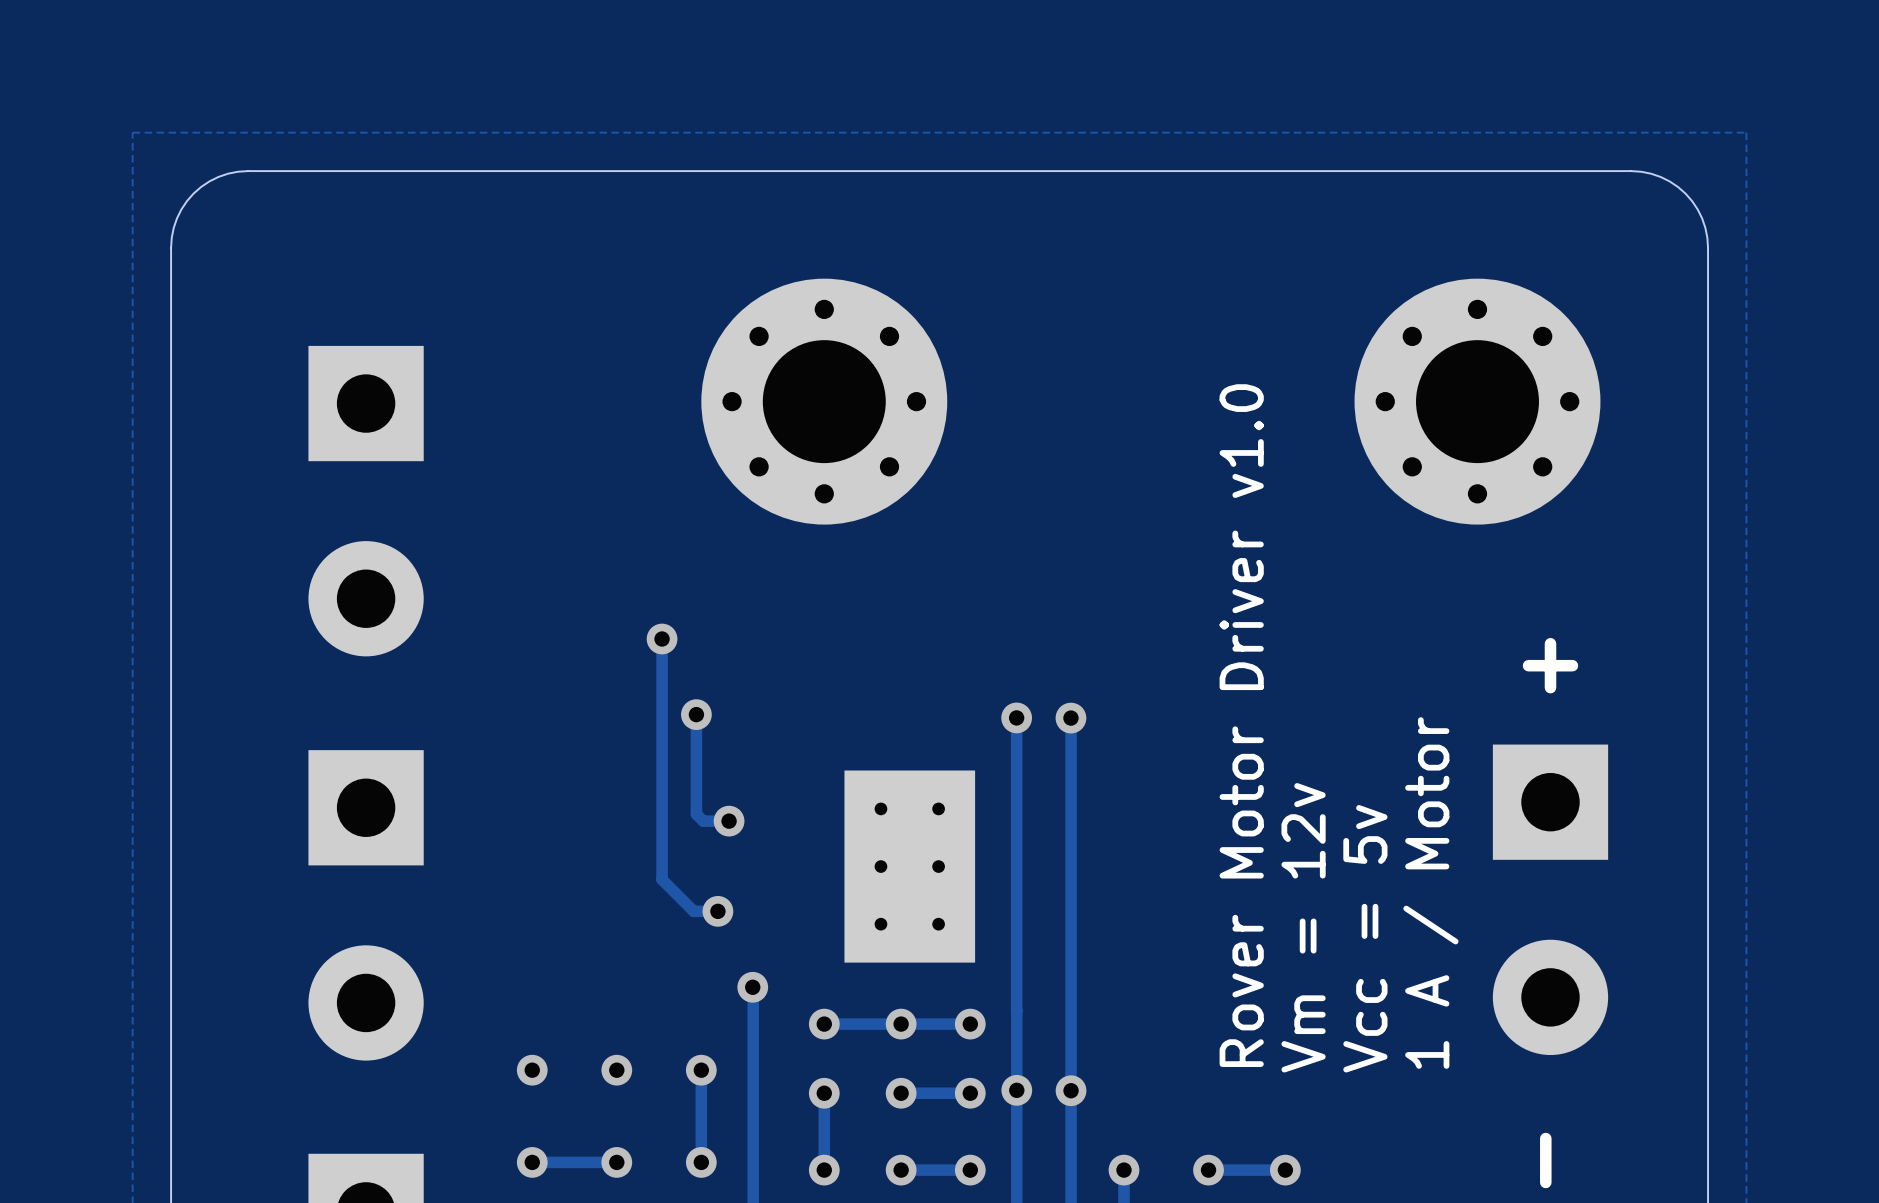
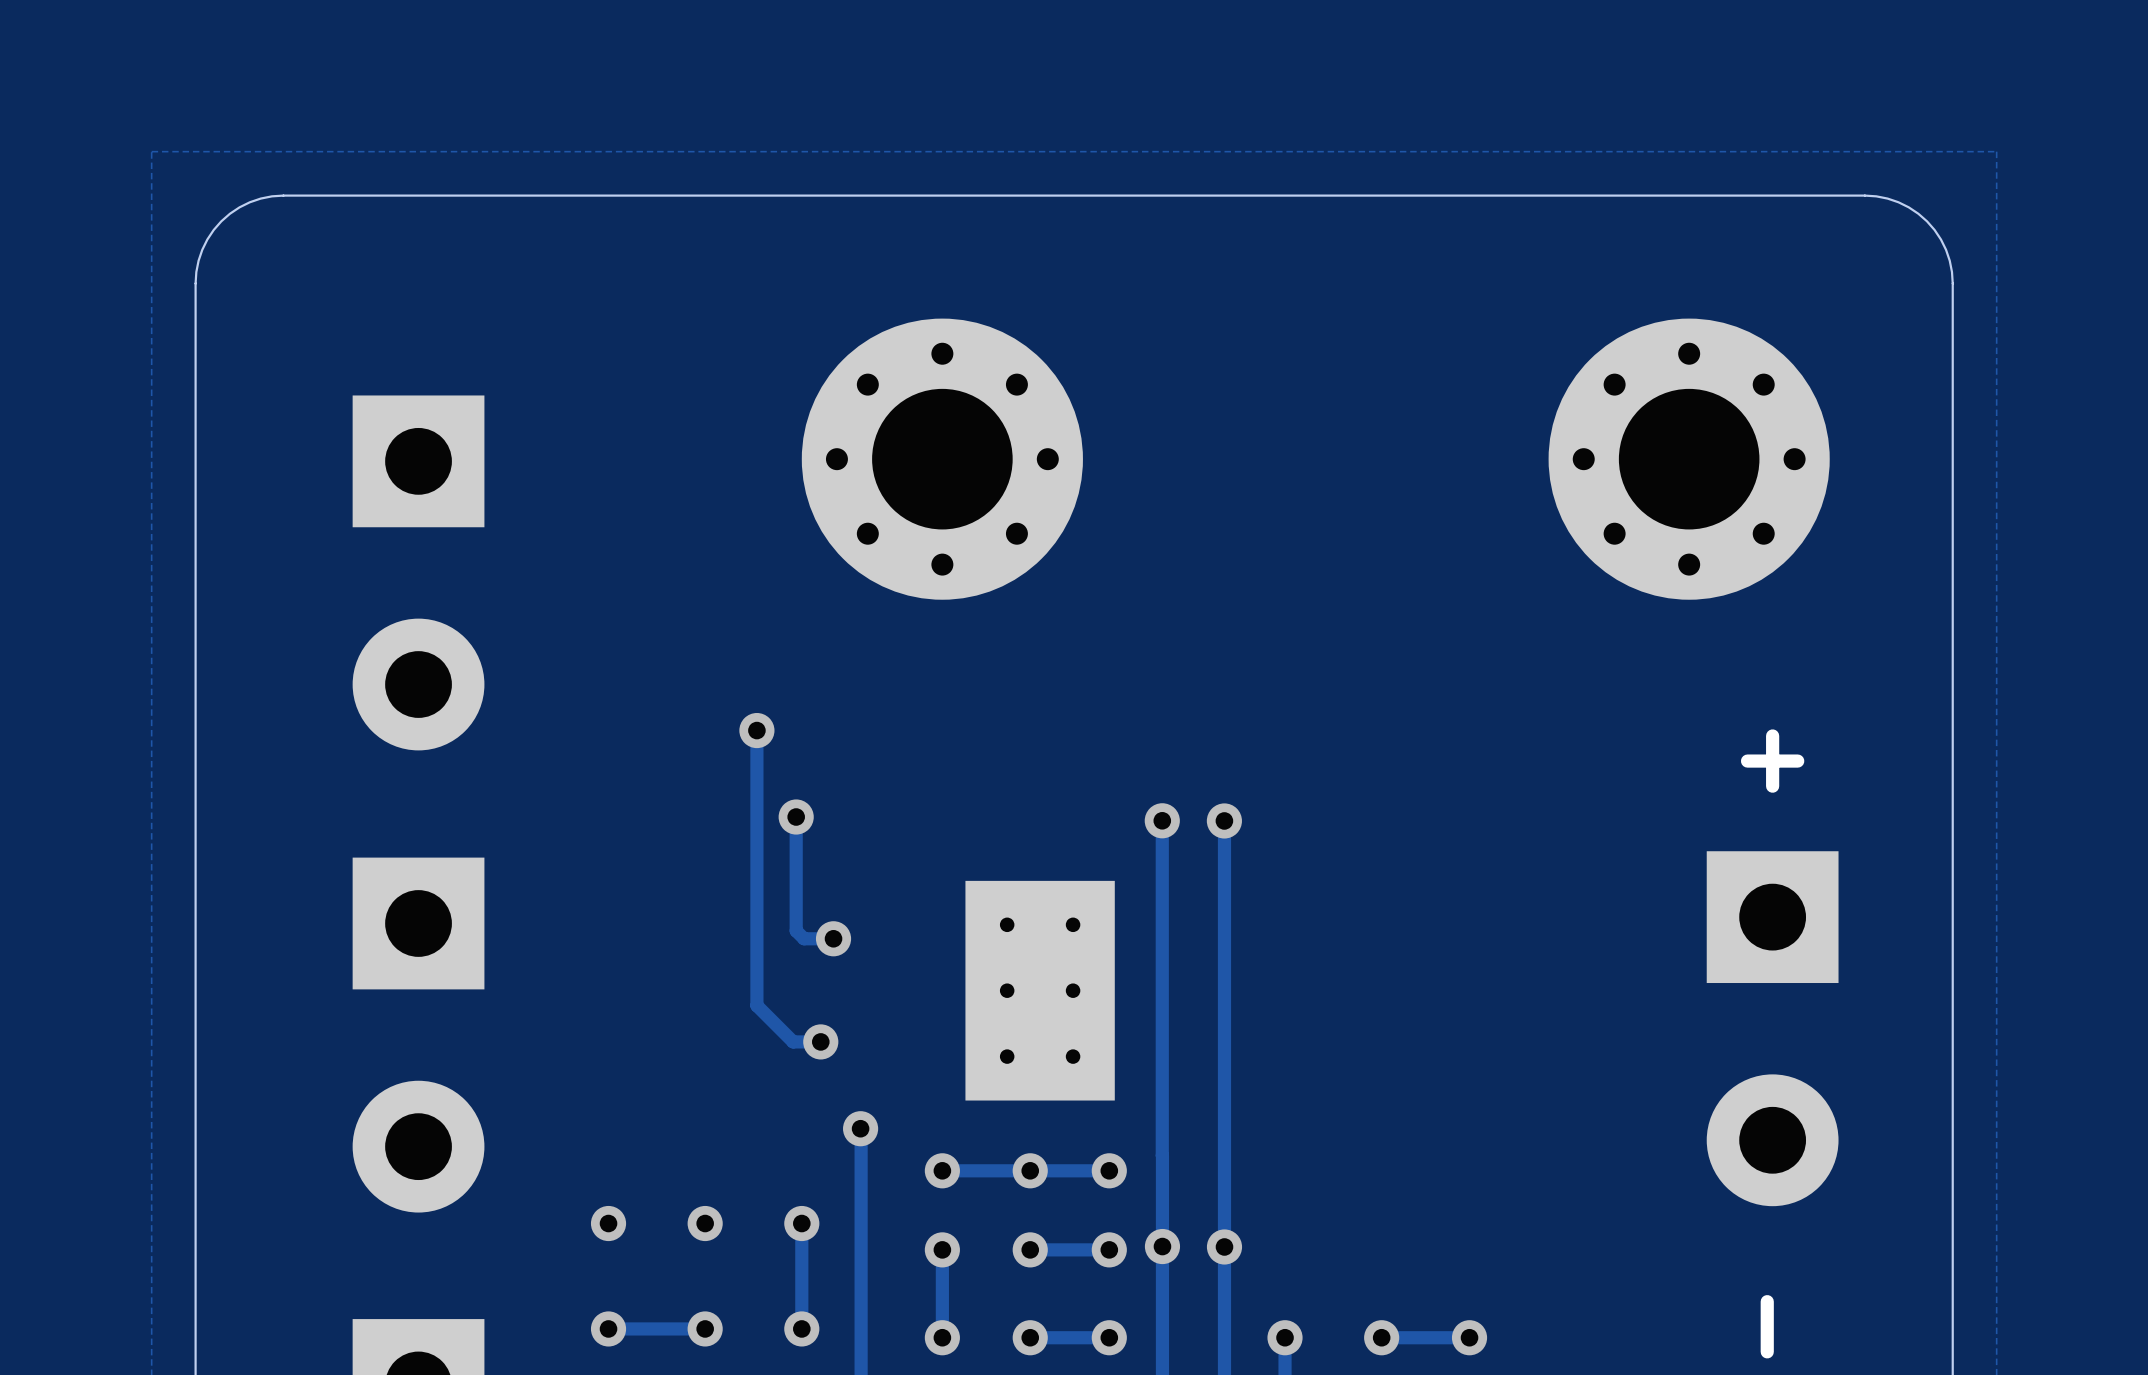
text: Rover Motor Driver v1.0 (1241, 725) -> none
text: 1 A / Motor (1430, 893) -> none
text: Vm = 12v (1303, 927) -> none
text: Vcc = 5v (1365, 938) -> none

